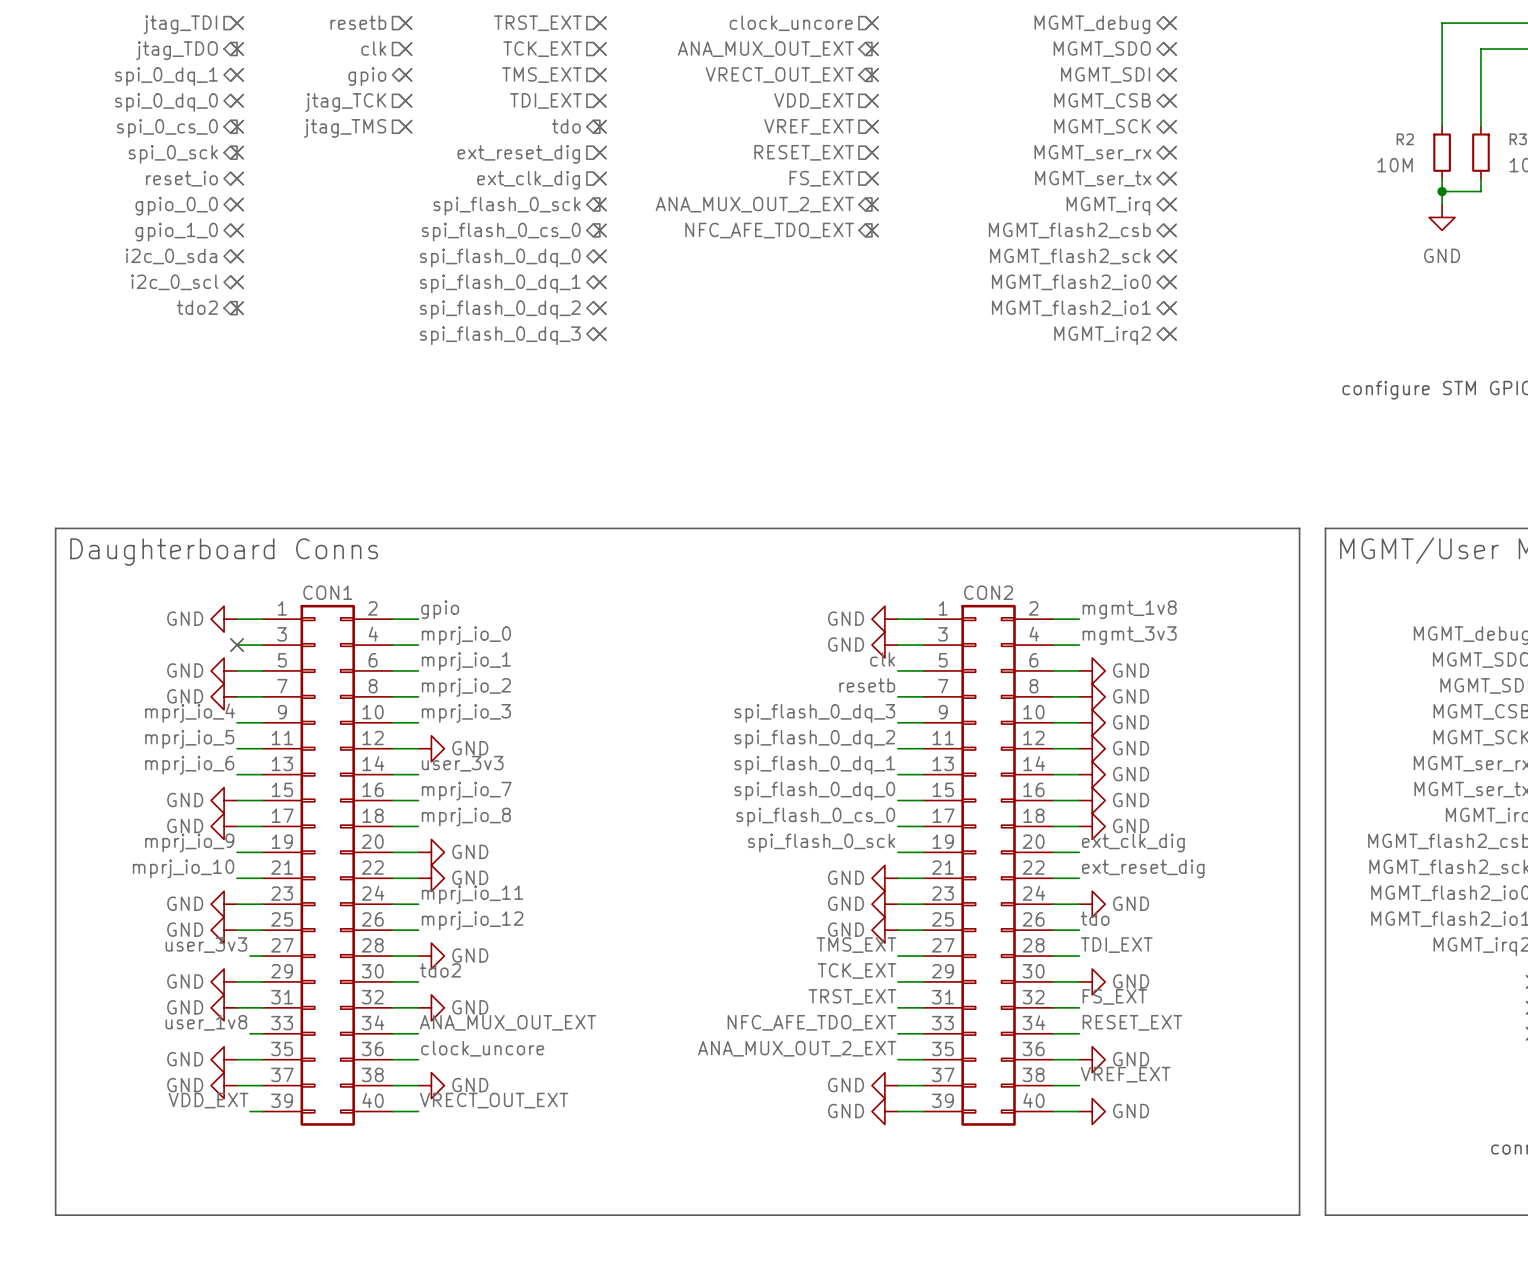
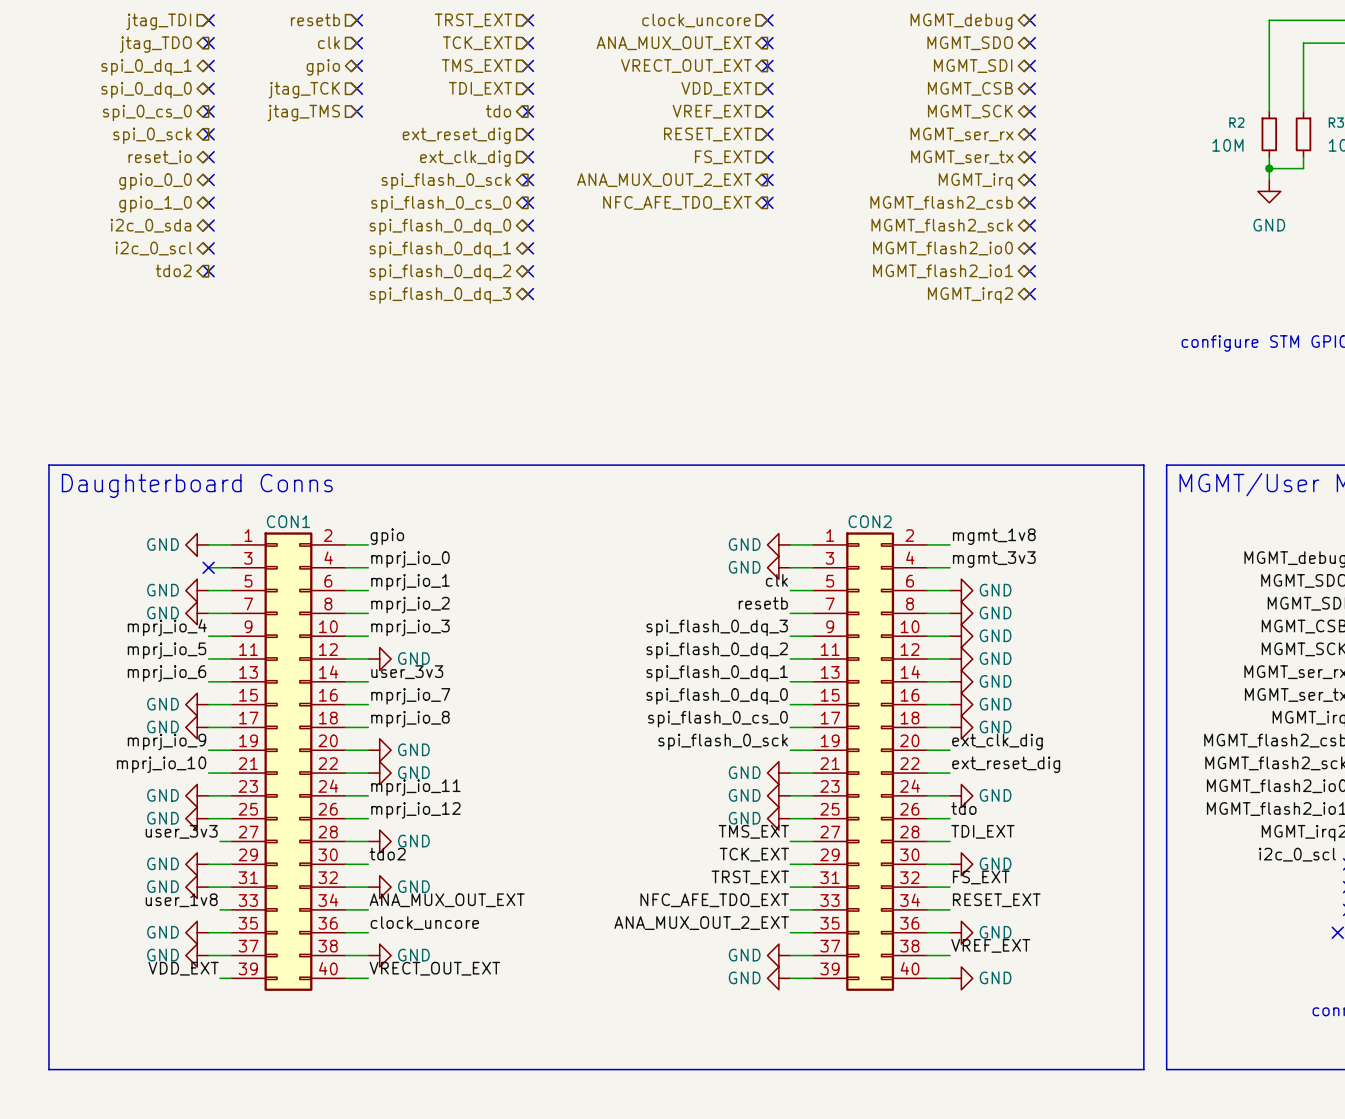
label: none -> i2c_0_scl (1297, 854)
no-connect mark: none -> (1337, 932)

